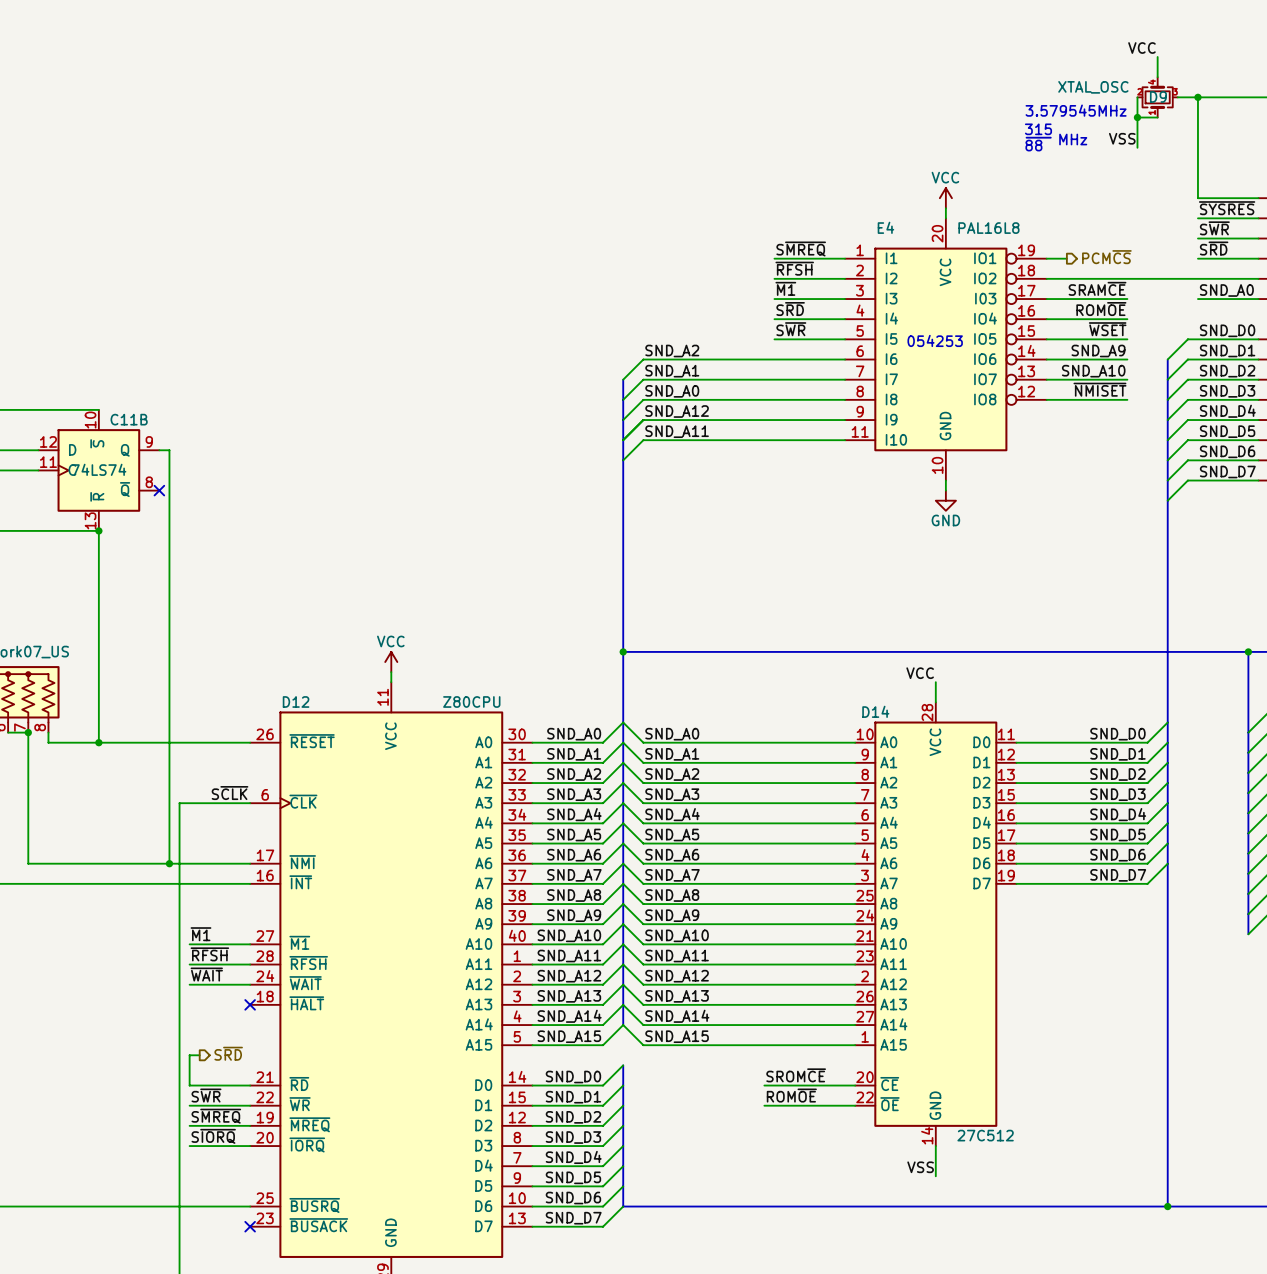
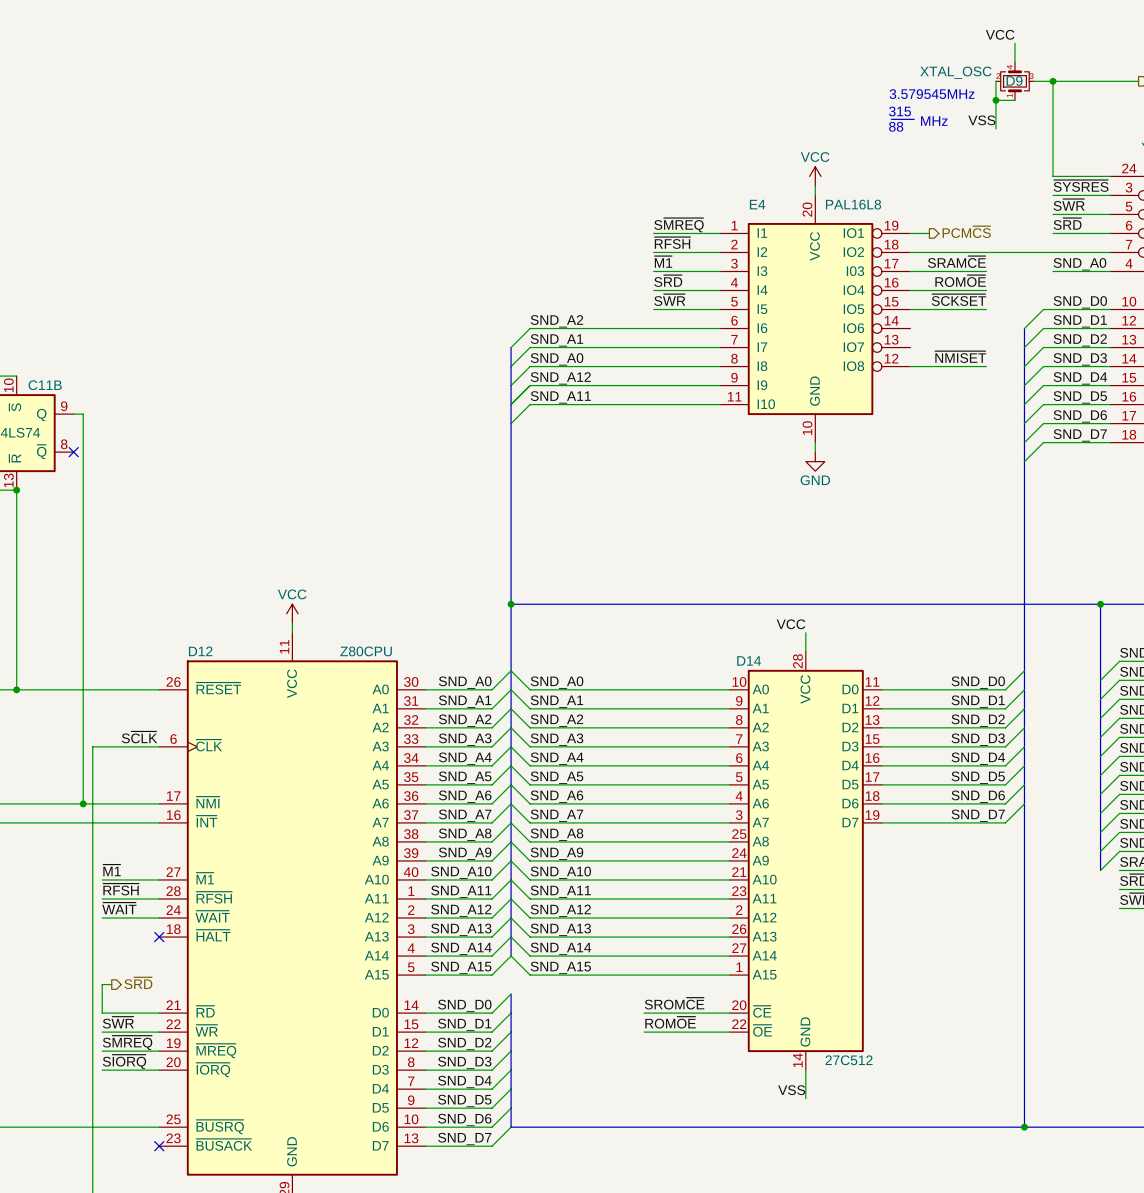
label: ~{WSET} (1107, 329) -> ~{SCKSET} (958, 300)
text: 054253 (935, 340) -> none
label: SND_A9 (1098, 351) -> none
wire: (1046, 359) (1127, 359) -> none
label: SND_A10 (1093, 371) -> none
wire: (1046, 379) (1127, 379) -> none

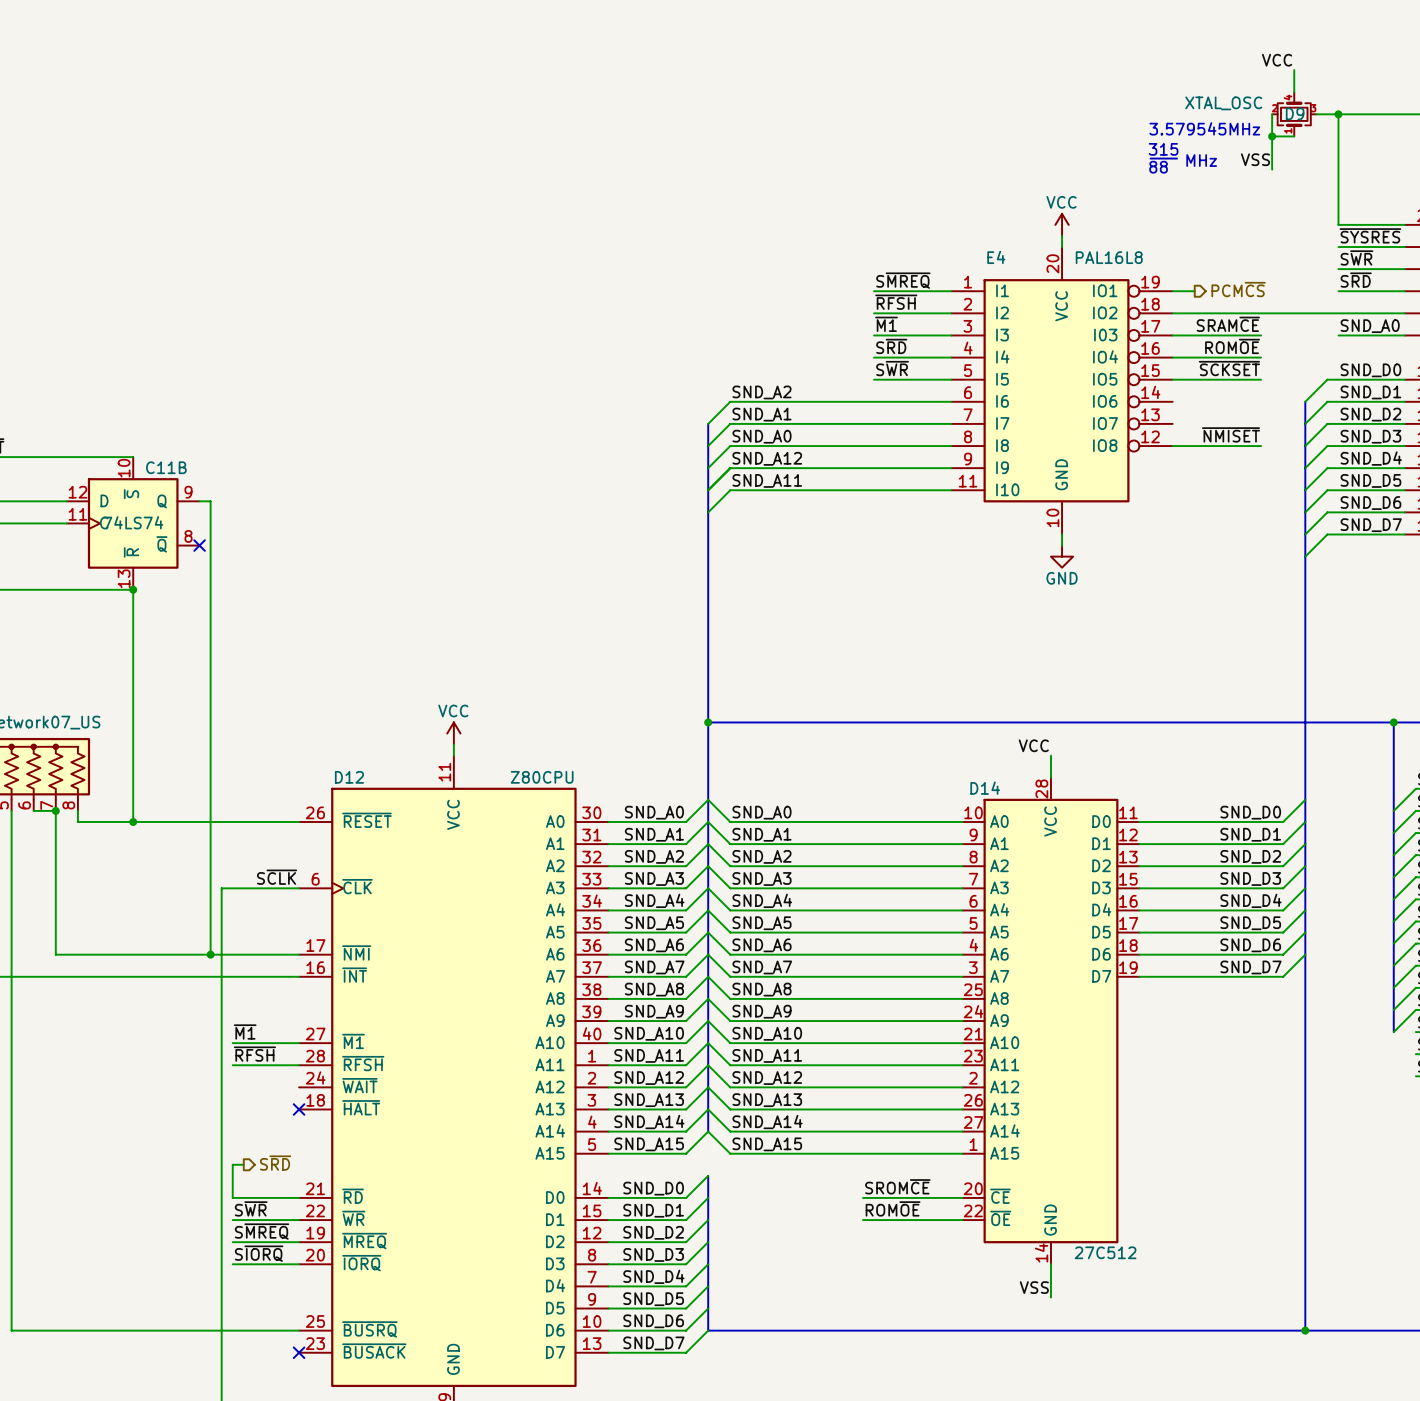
label: ~{WAIT} (119, 908) -> none
wire: (102, 918) (159, 918) -> none

